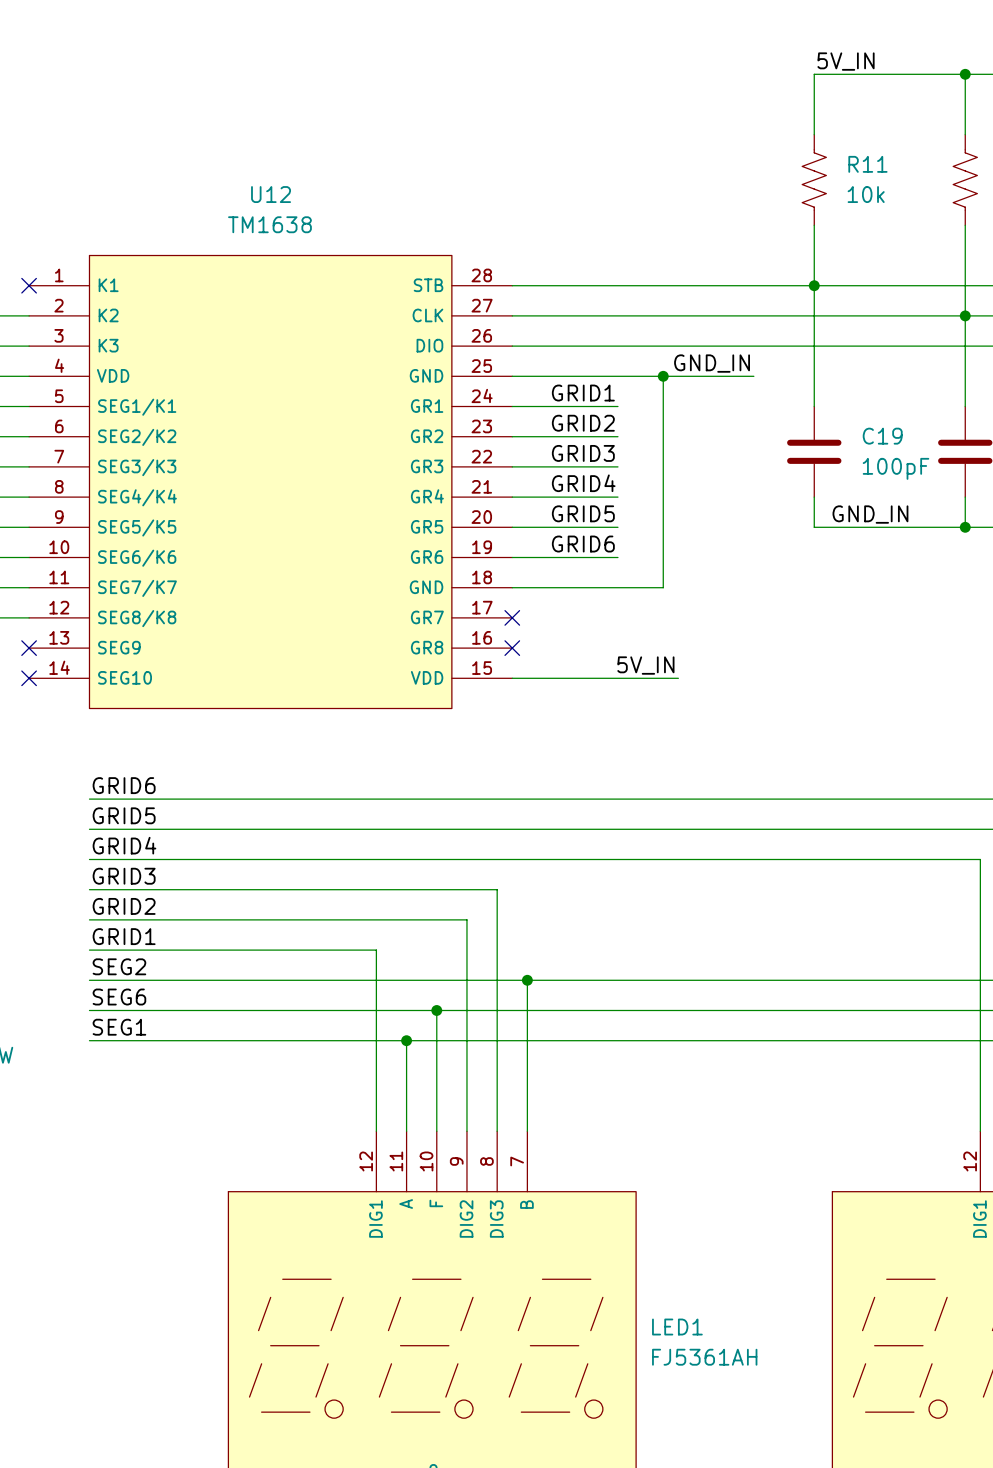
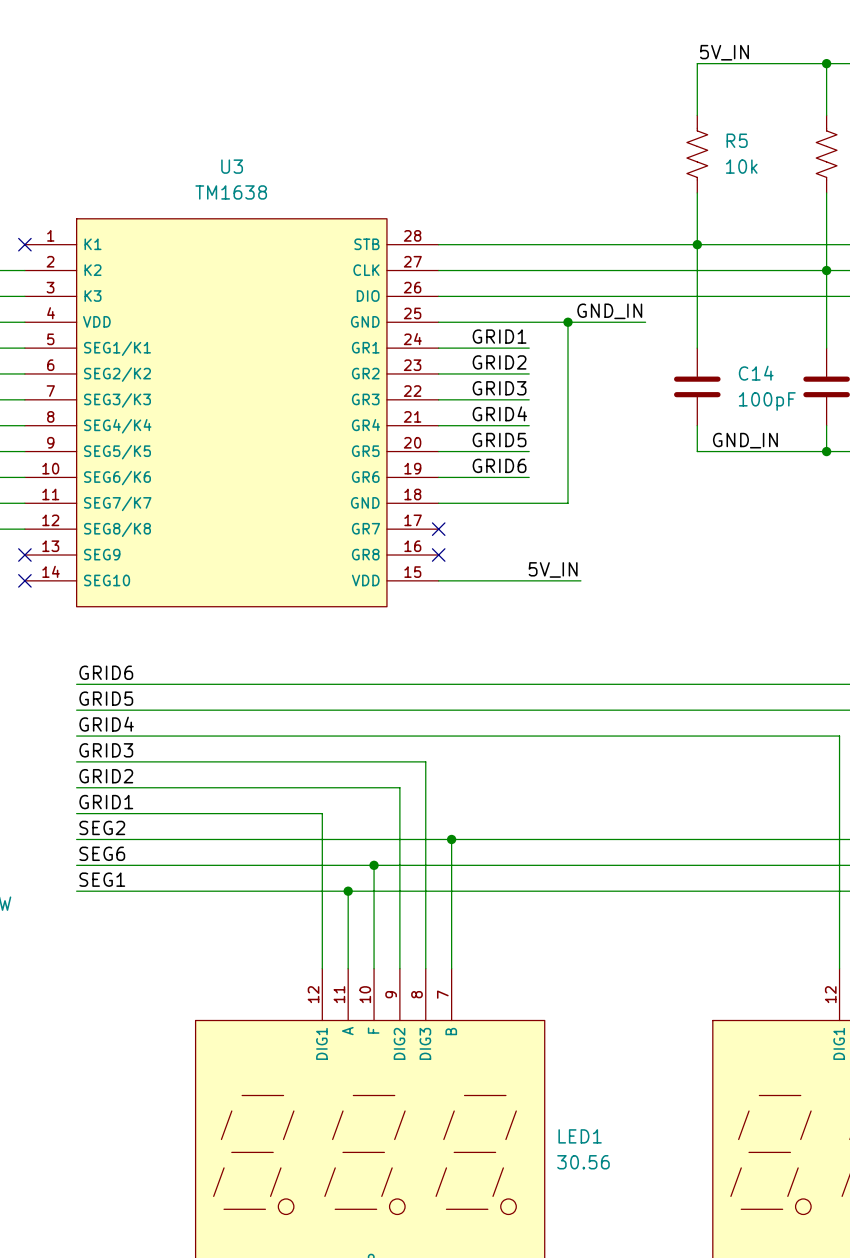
R11 name: R11 (867, 164) -> R5 (737, 140)
U12 name: U12 (271, 194) -> U3 (232, 166)
C19 name: C19 (882, 436) -> C14 (756, 373)
LED1 value: FJ5361AH (704, 1357) -> 30.56 (583, 1162)

